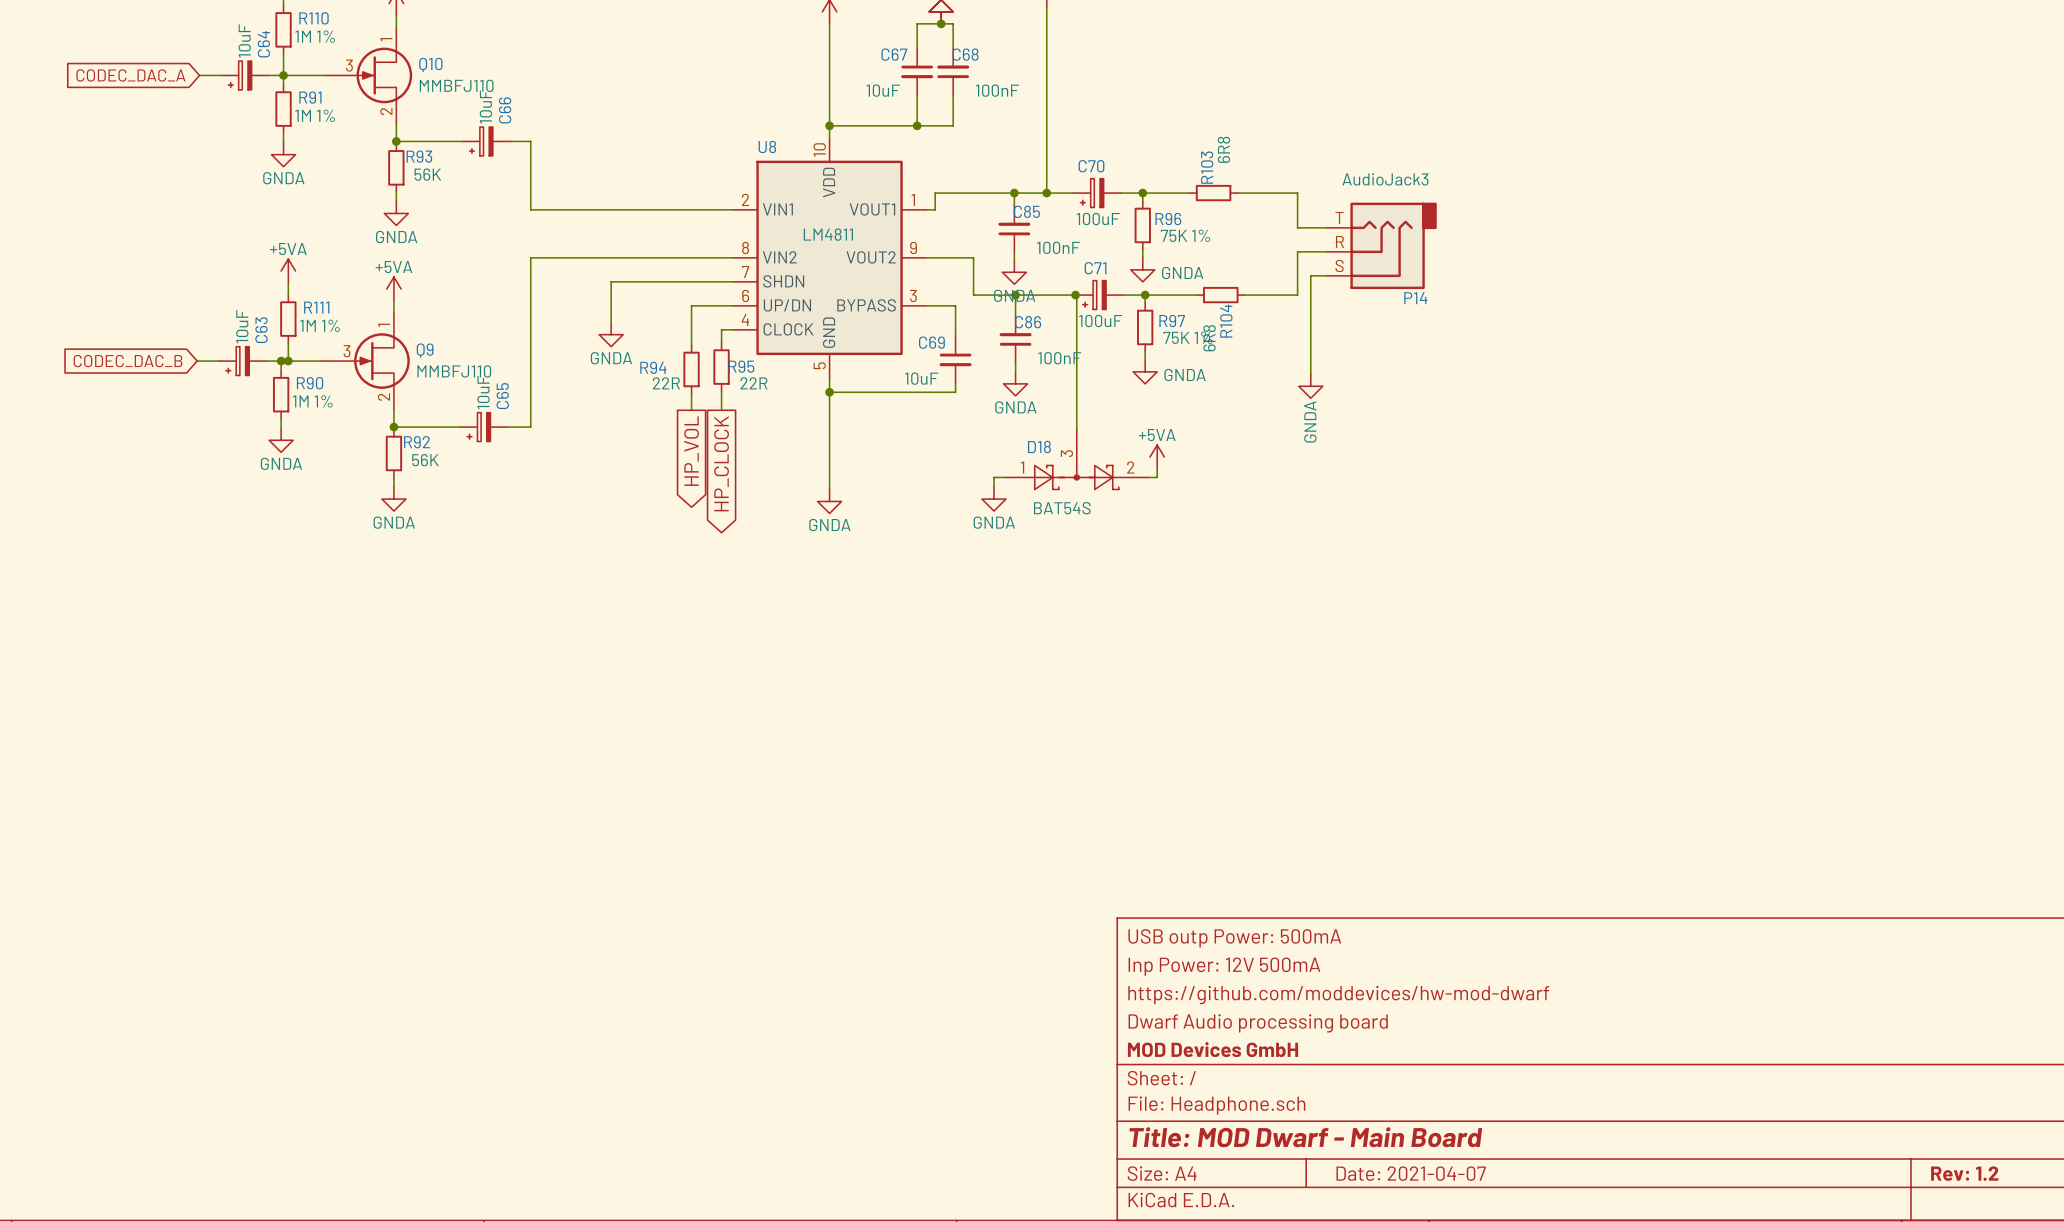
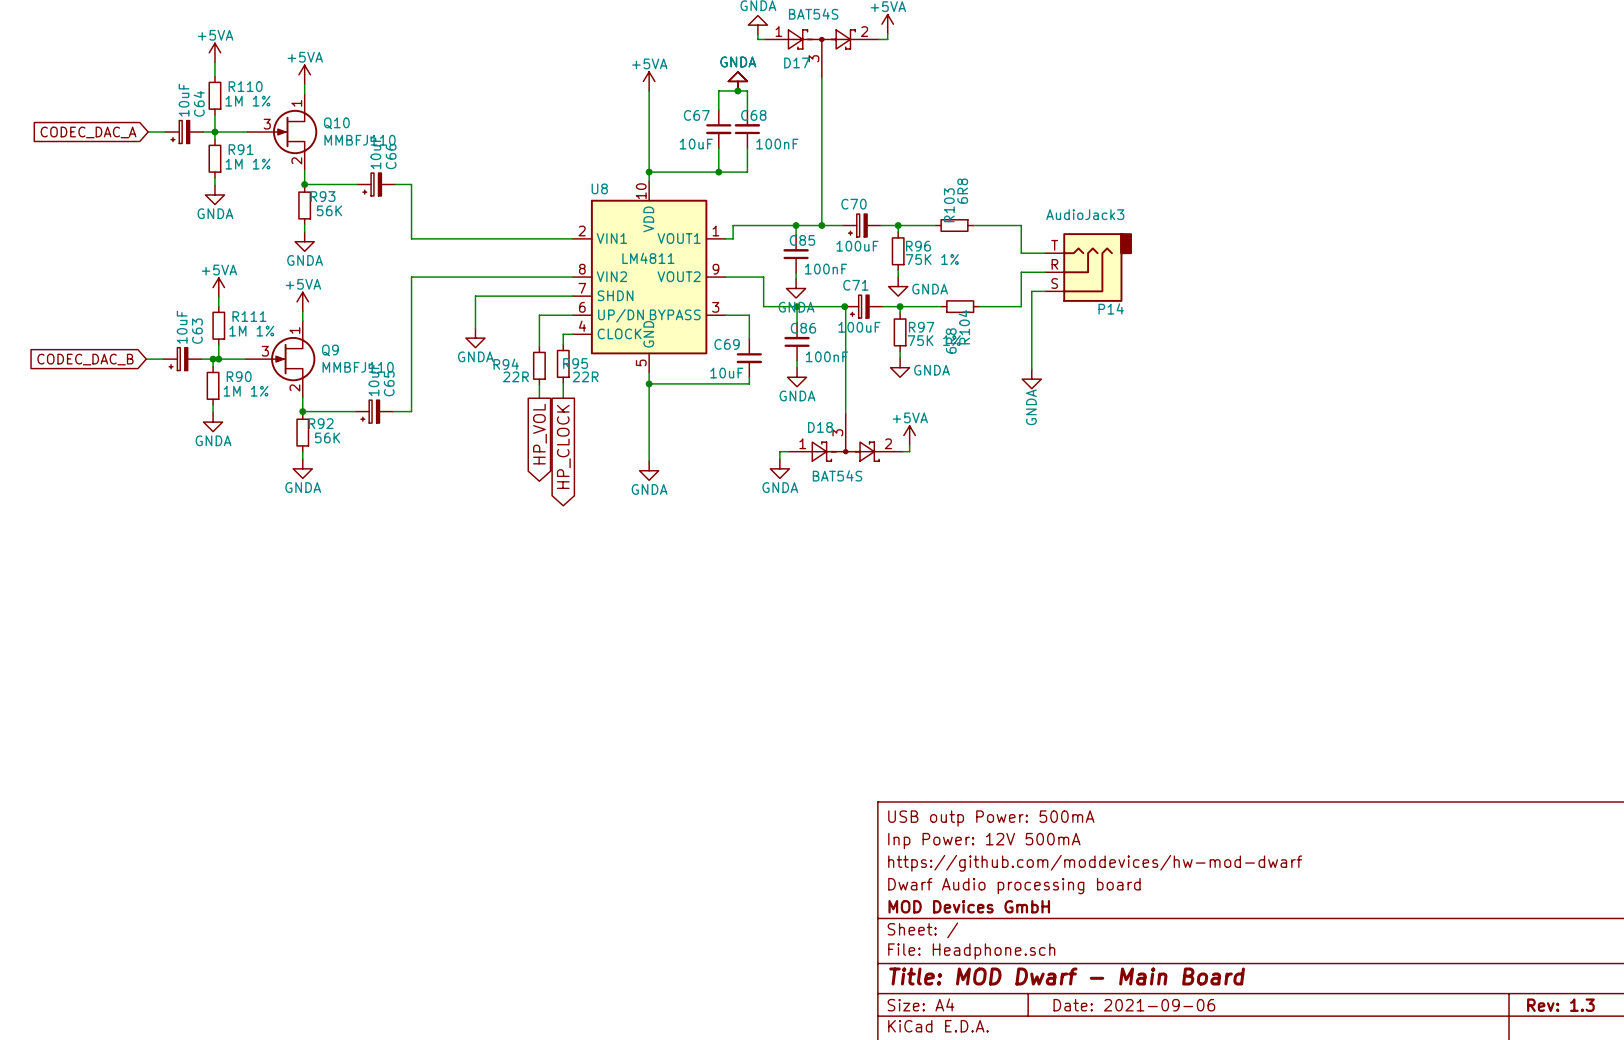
title block: Date: 2021-04-07 (1411, 1173) -> Date: 2021-09-06 (1134, 1005)
title block: Rev: 1.2 (1964, 1173) -> Rev: 1.3 (1560, 1005)

